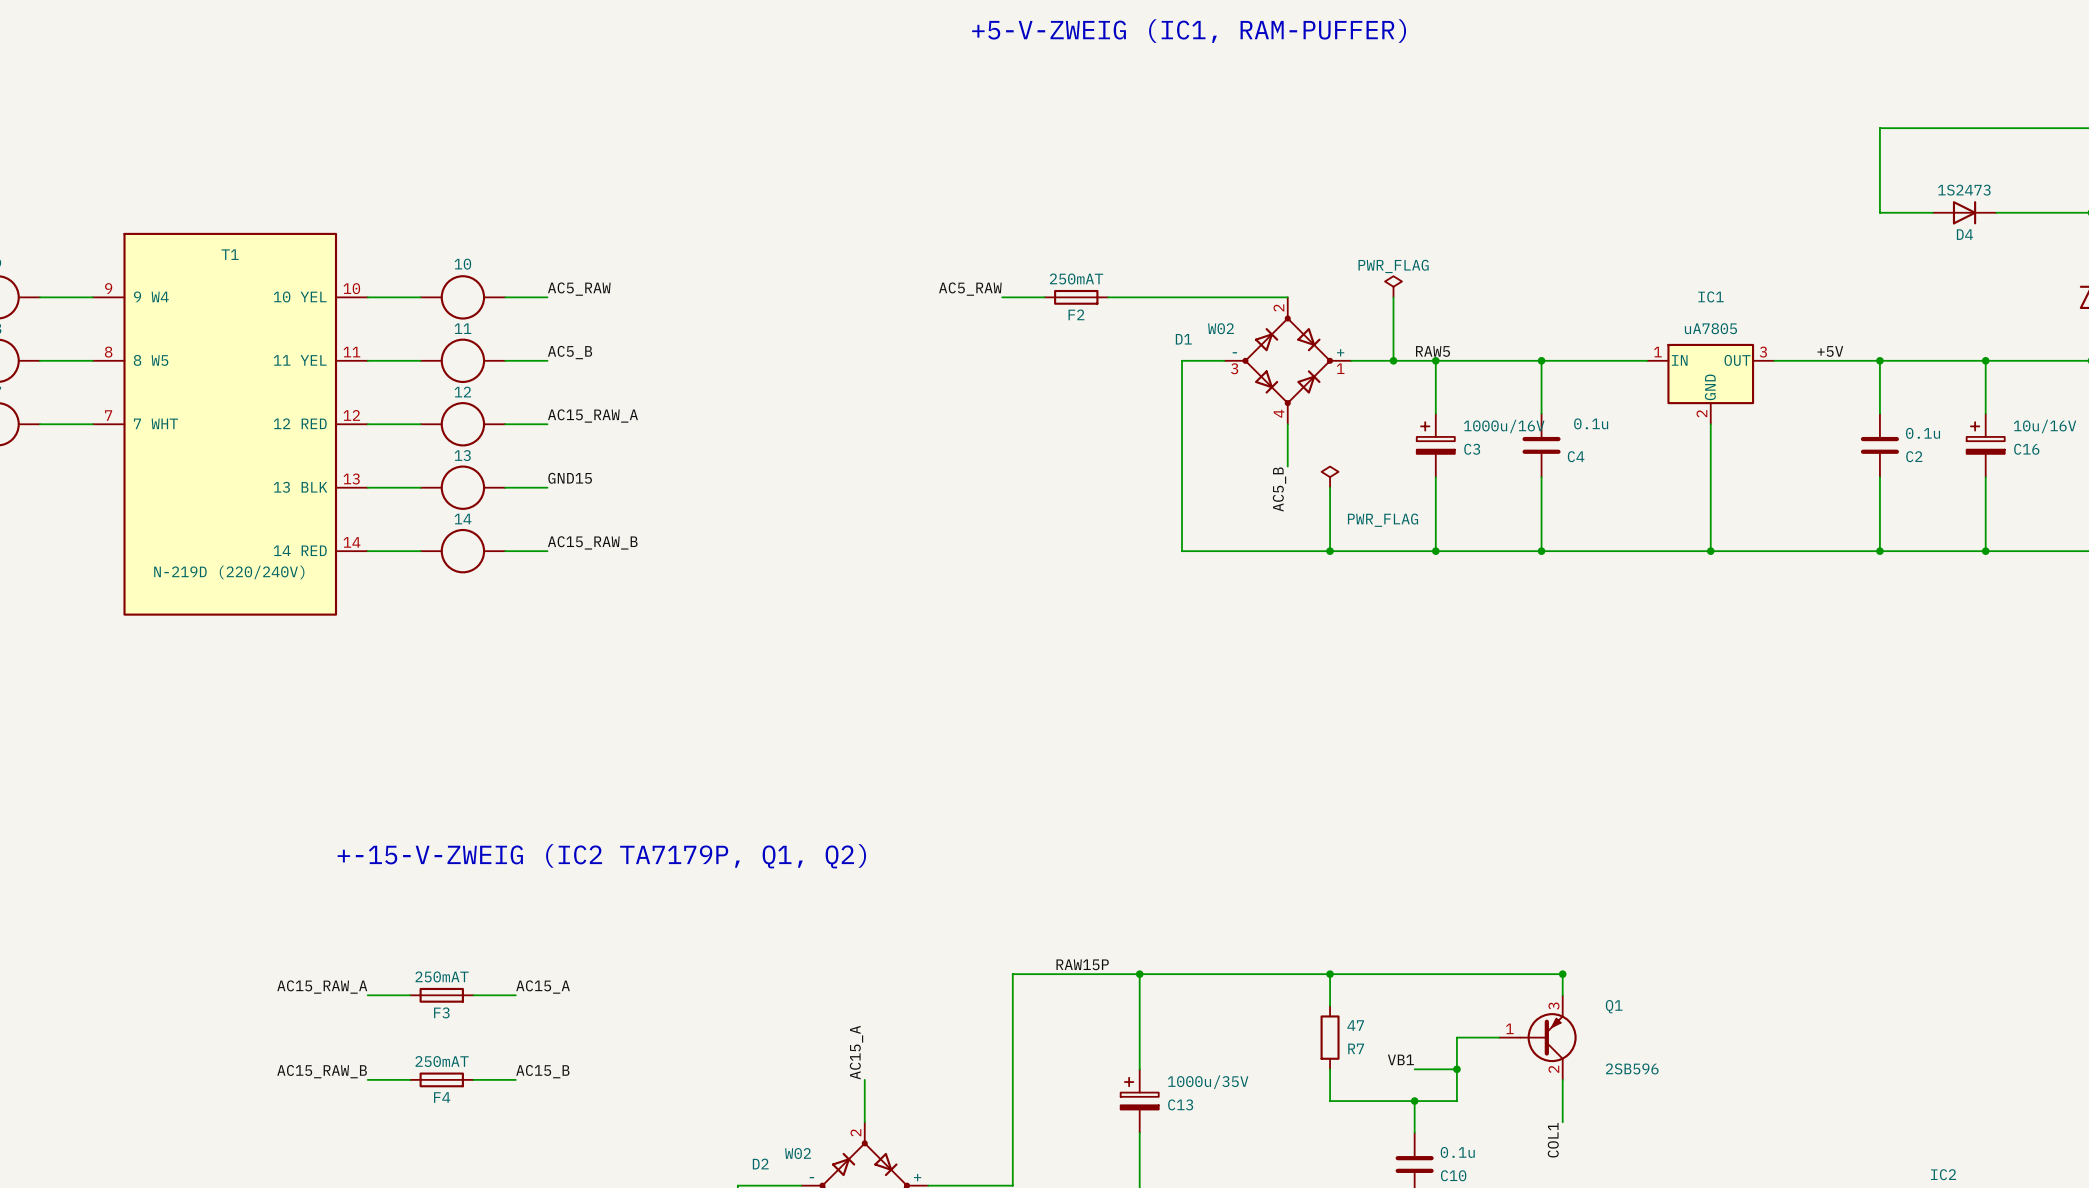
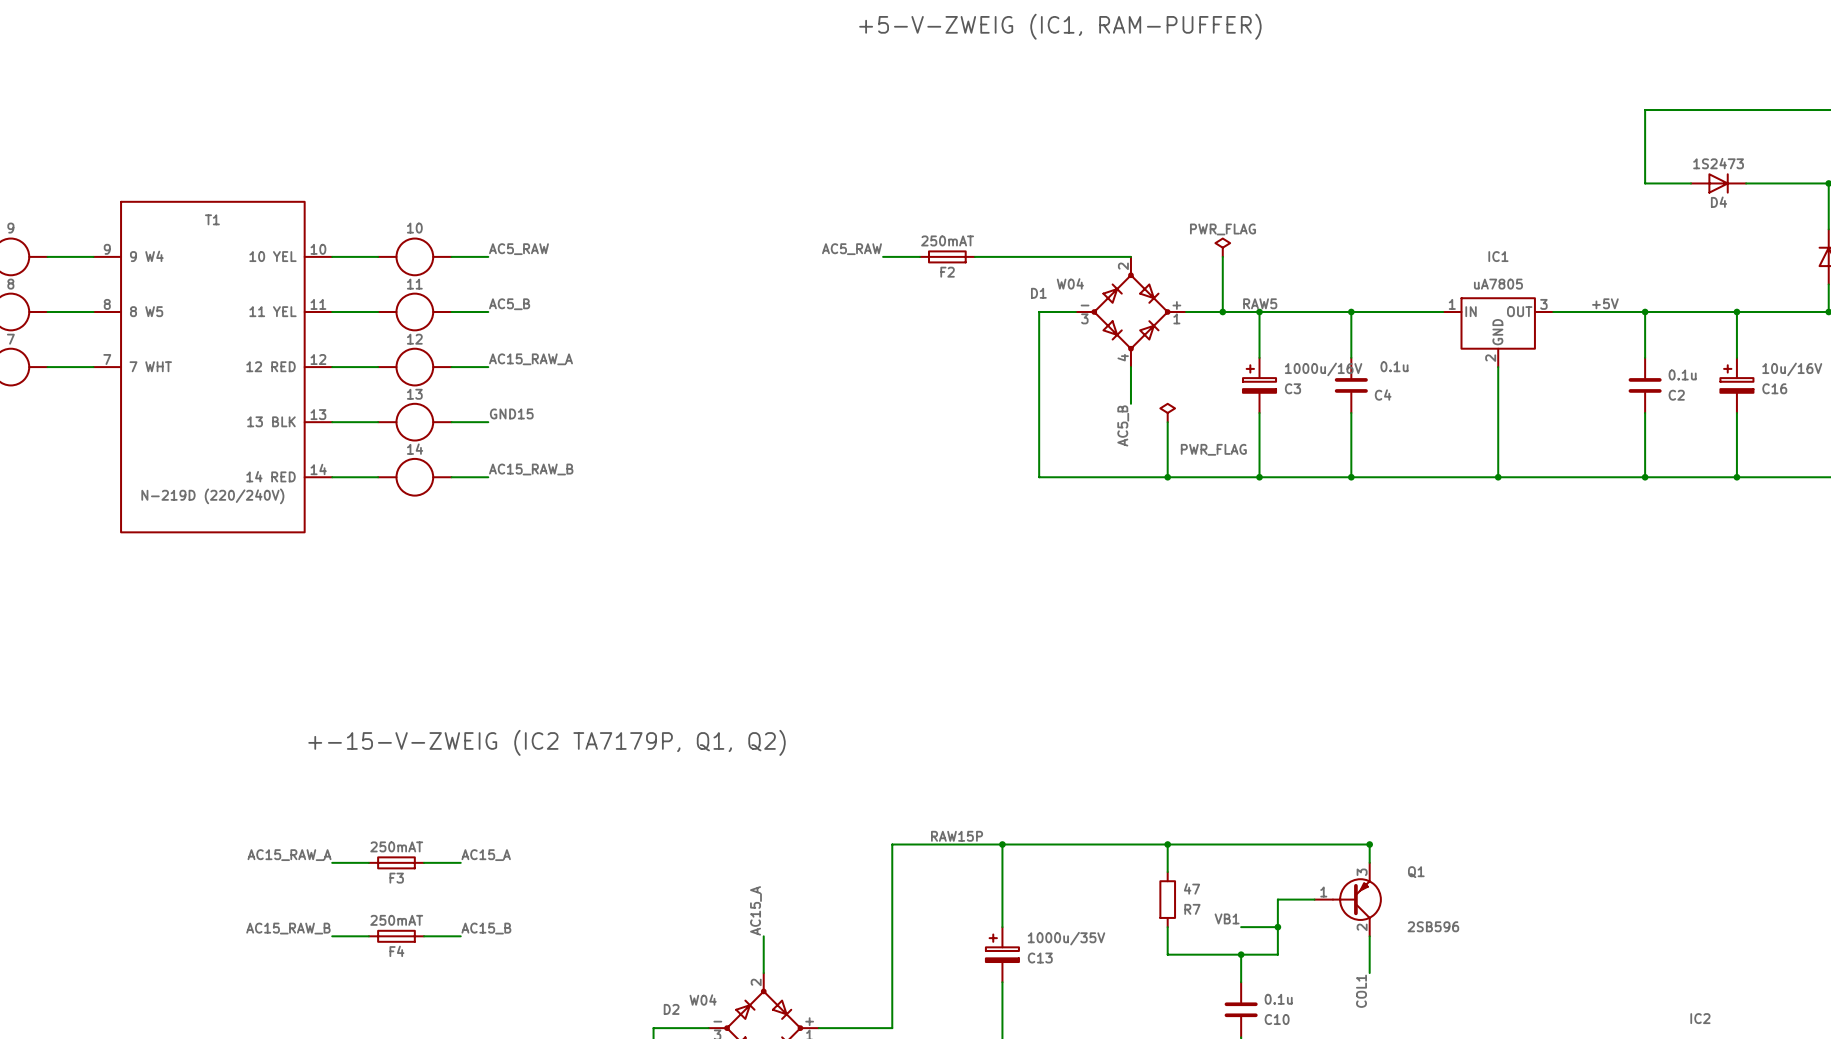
D1 value: W02 (1221, 328) -> W04 (1070, 283)
D2 value: W02 (798, 1153) -> W04 (703, 1000)

